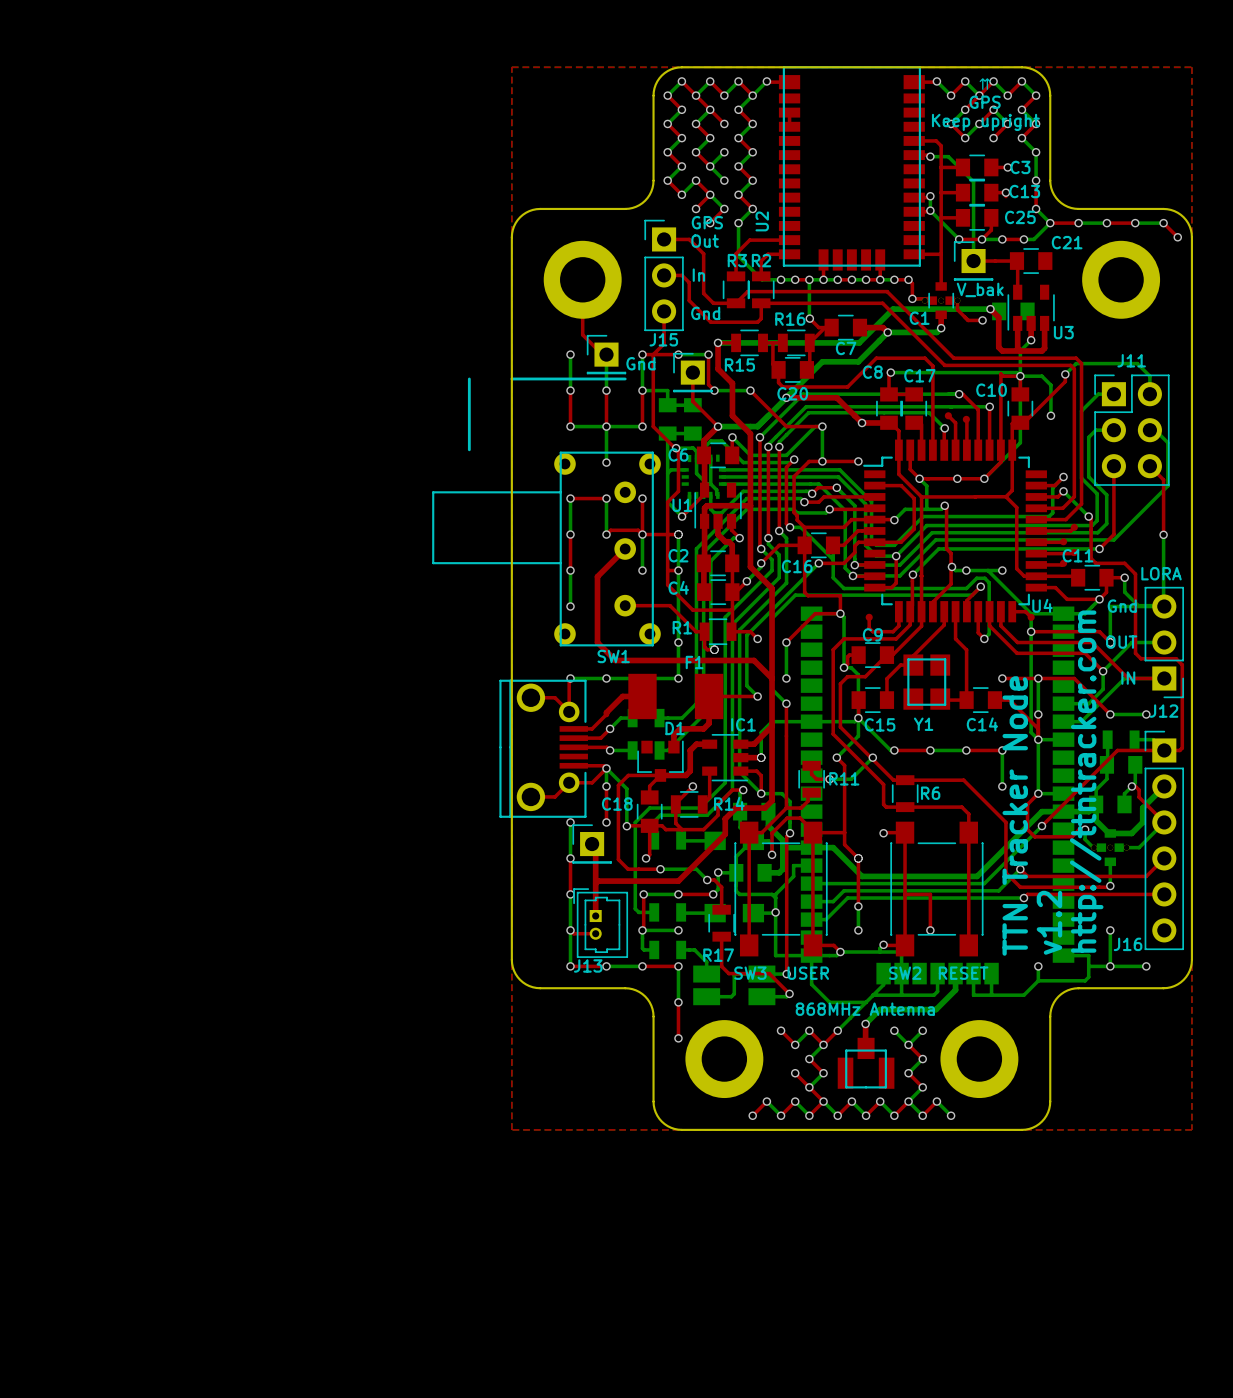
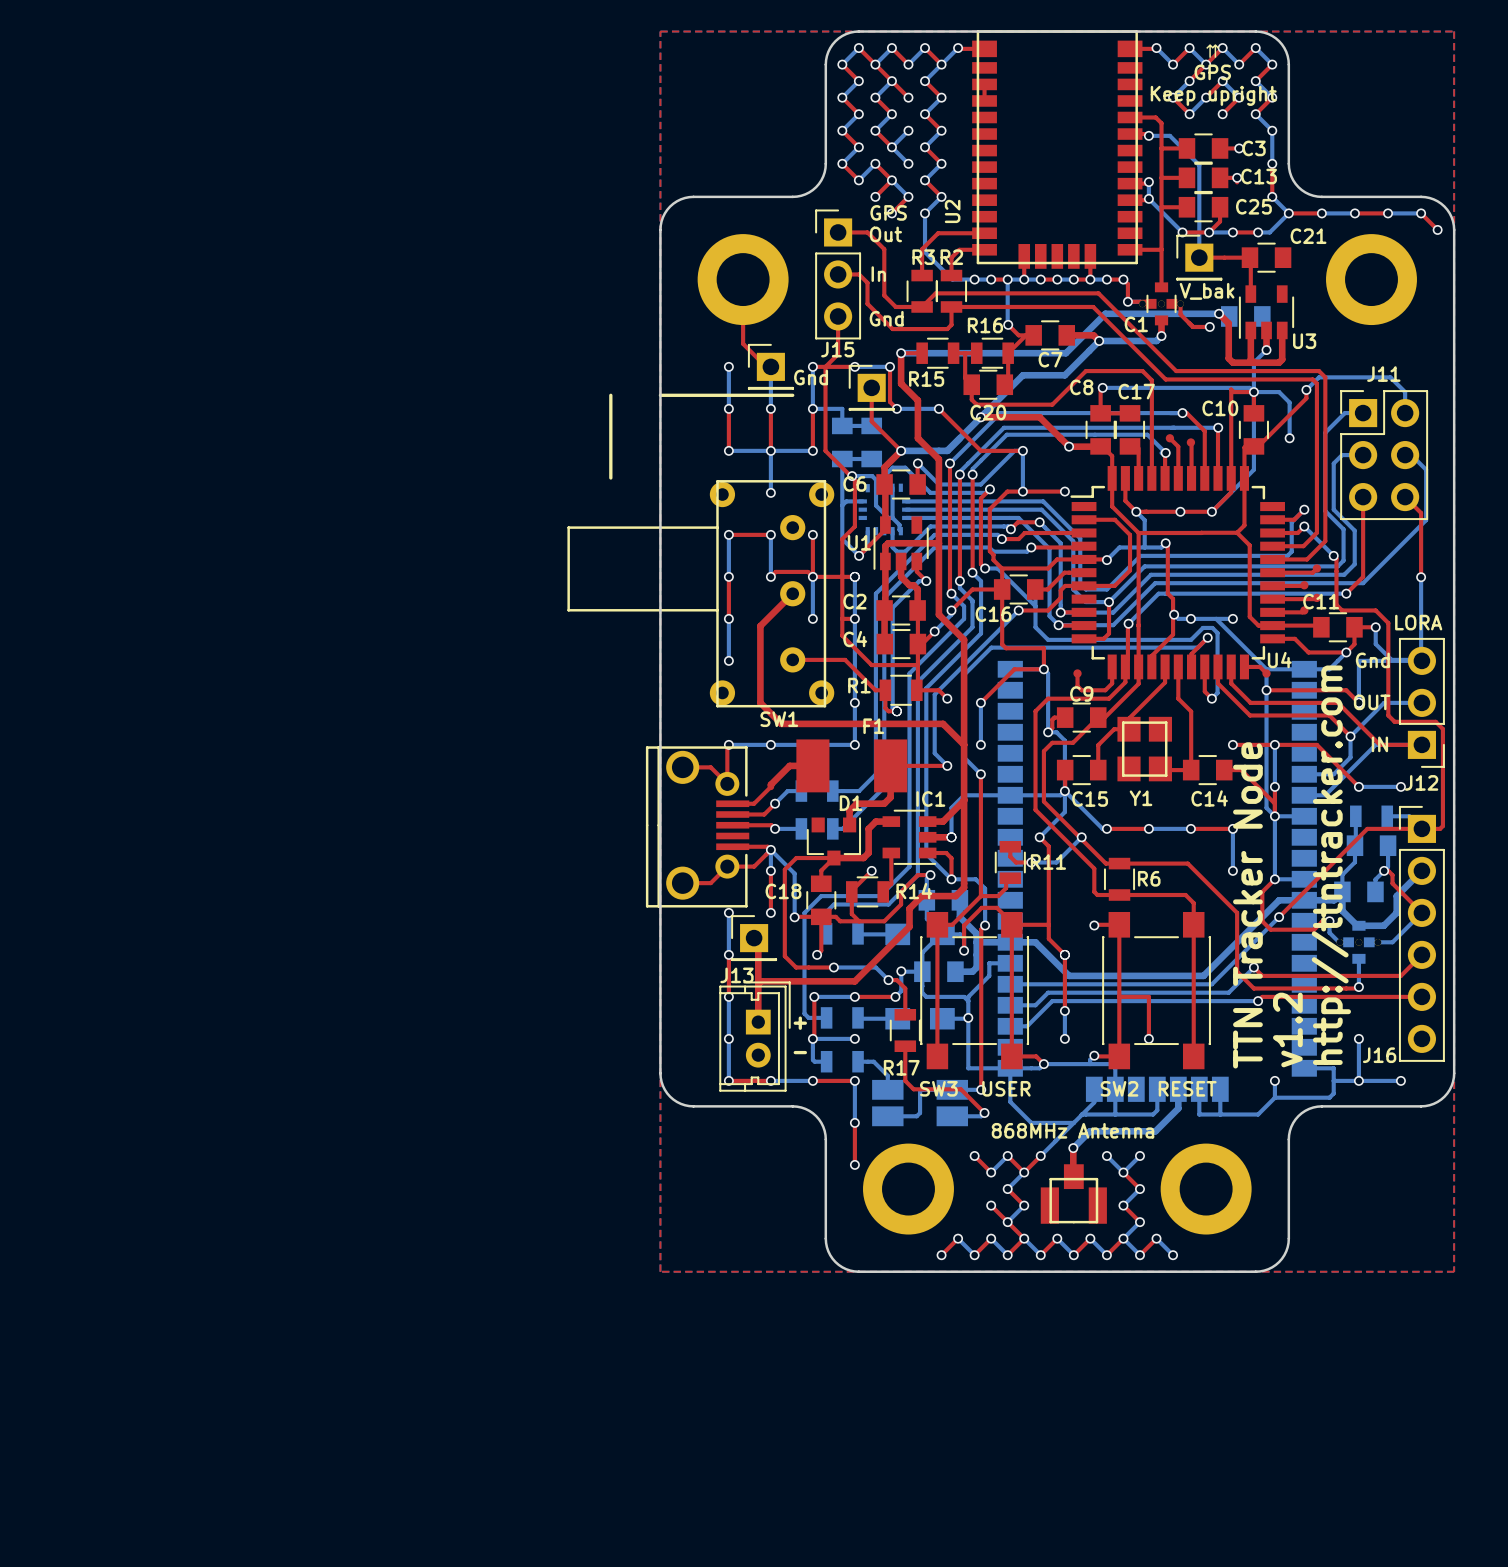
J13 footprint: [573, 888, 629, 958] -> [719, 981, 791, 1092]
text: none -> + (800, 1023)
top track: (570, 930) (573, 933) (595, 933) -> none
text: none -> - (800, 1052)
J13 name position: J13 (588, 965) -> J13 (736, 975)

